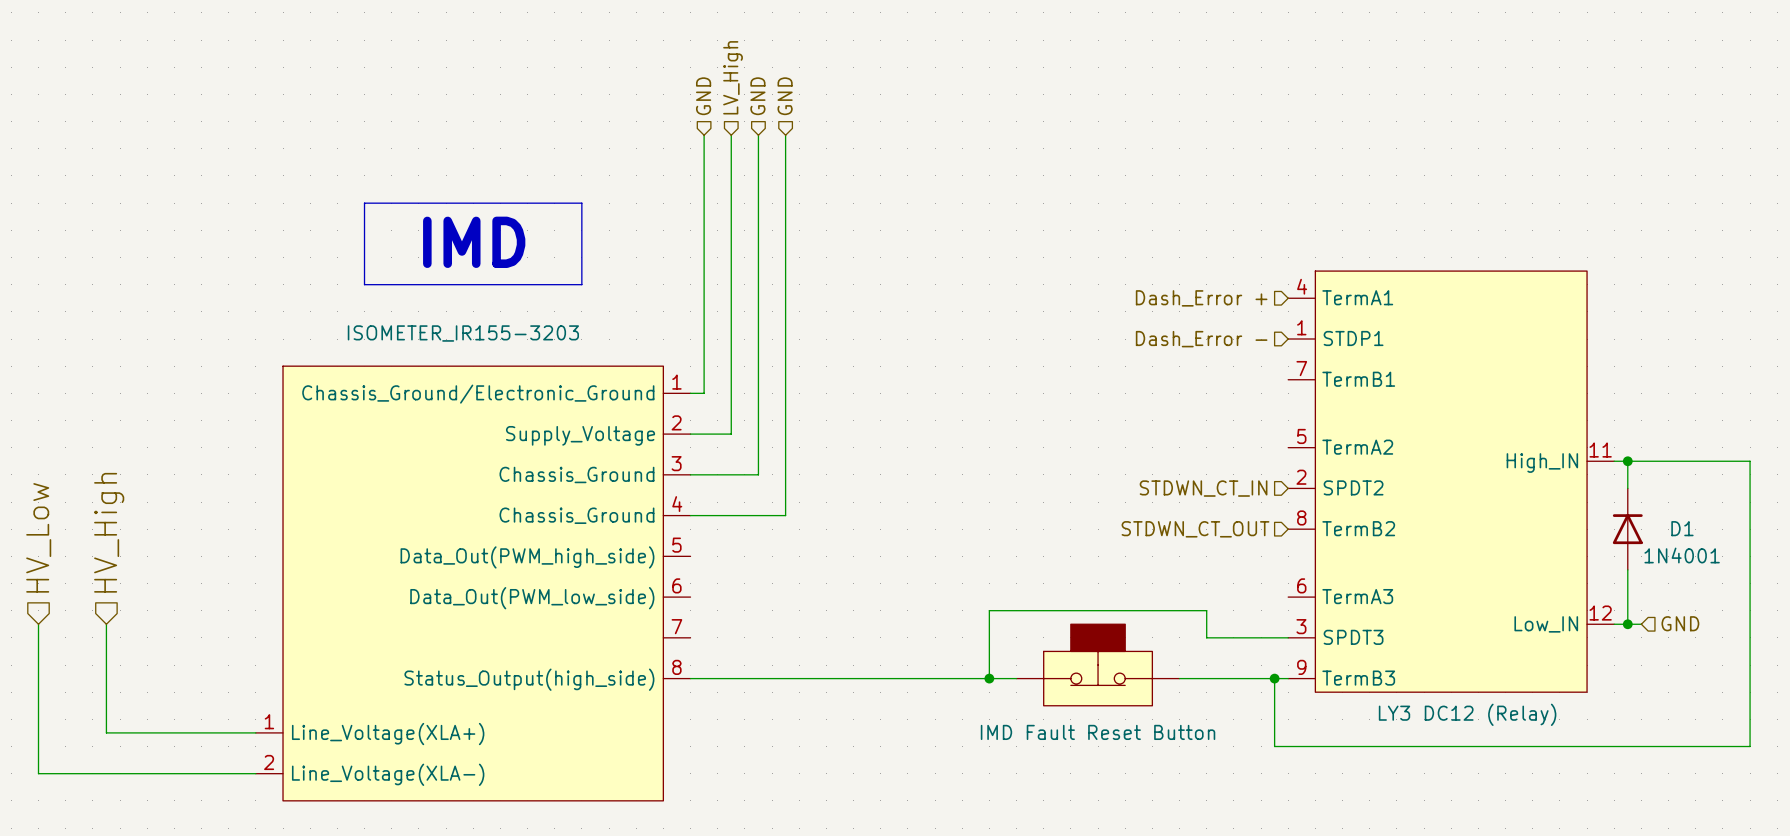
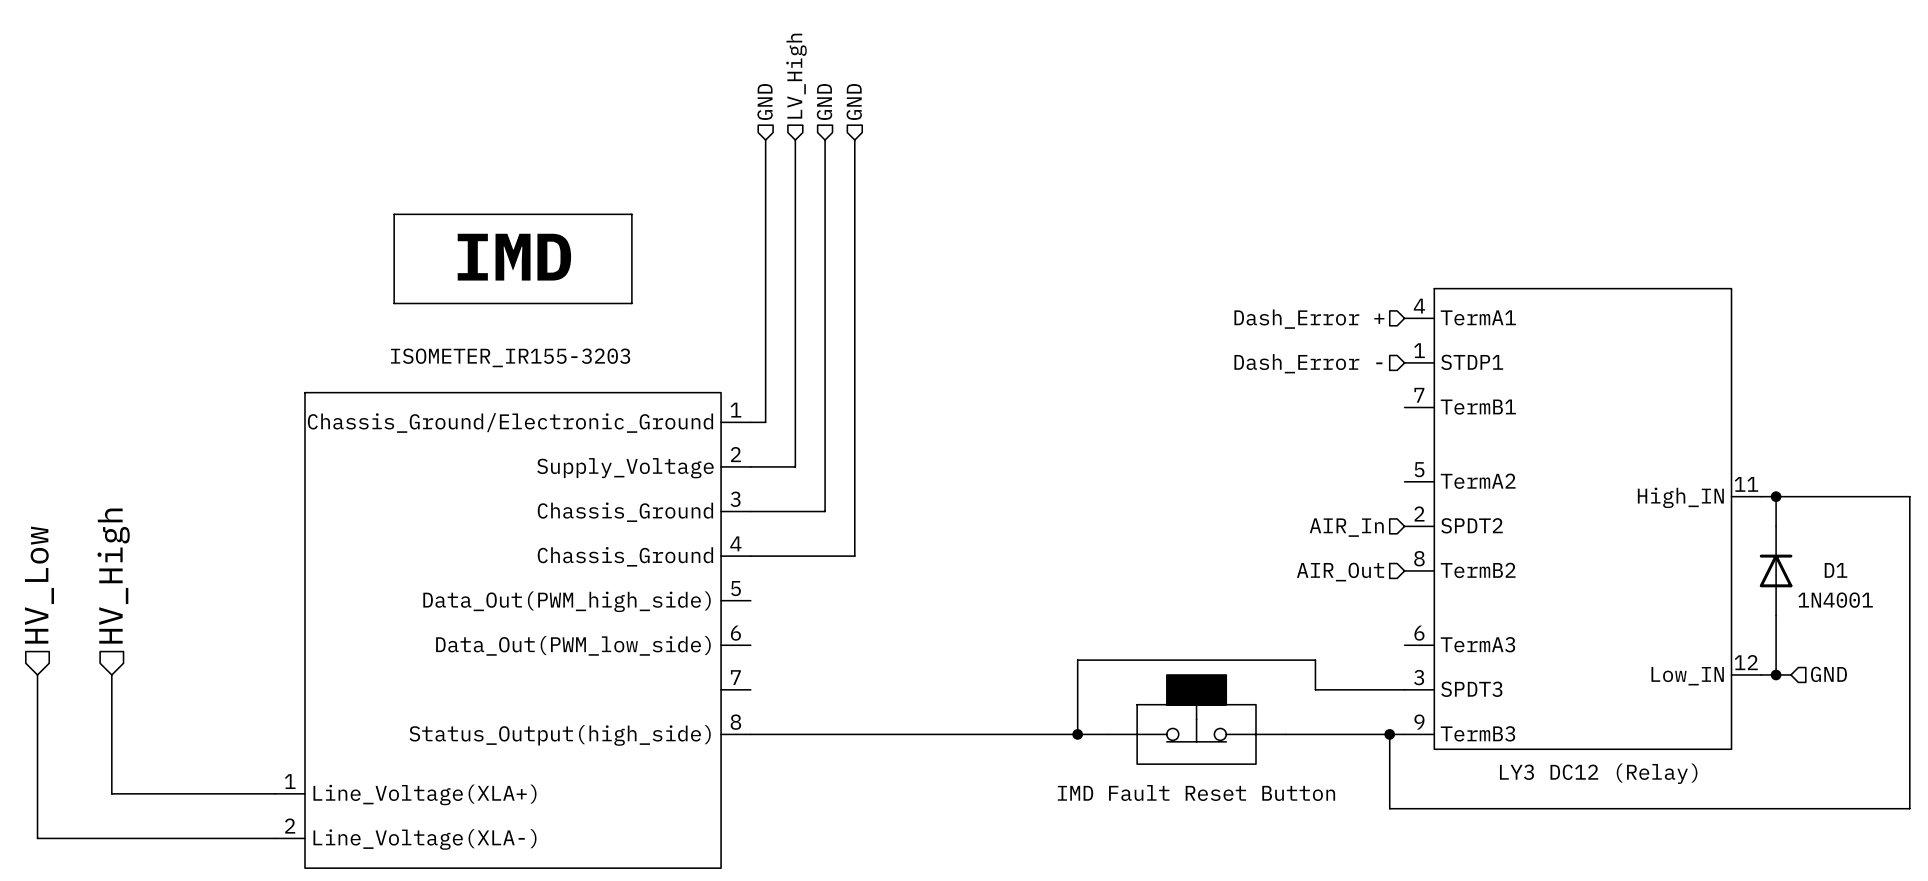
hierarchical label: STDWN_CT_IN (1203, 488) -> AIR_In (1346, 527)
hierarchical label: STDWN_CT_OUT (1195, 529) -> AIR_Out (1340, 572)

